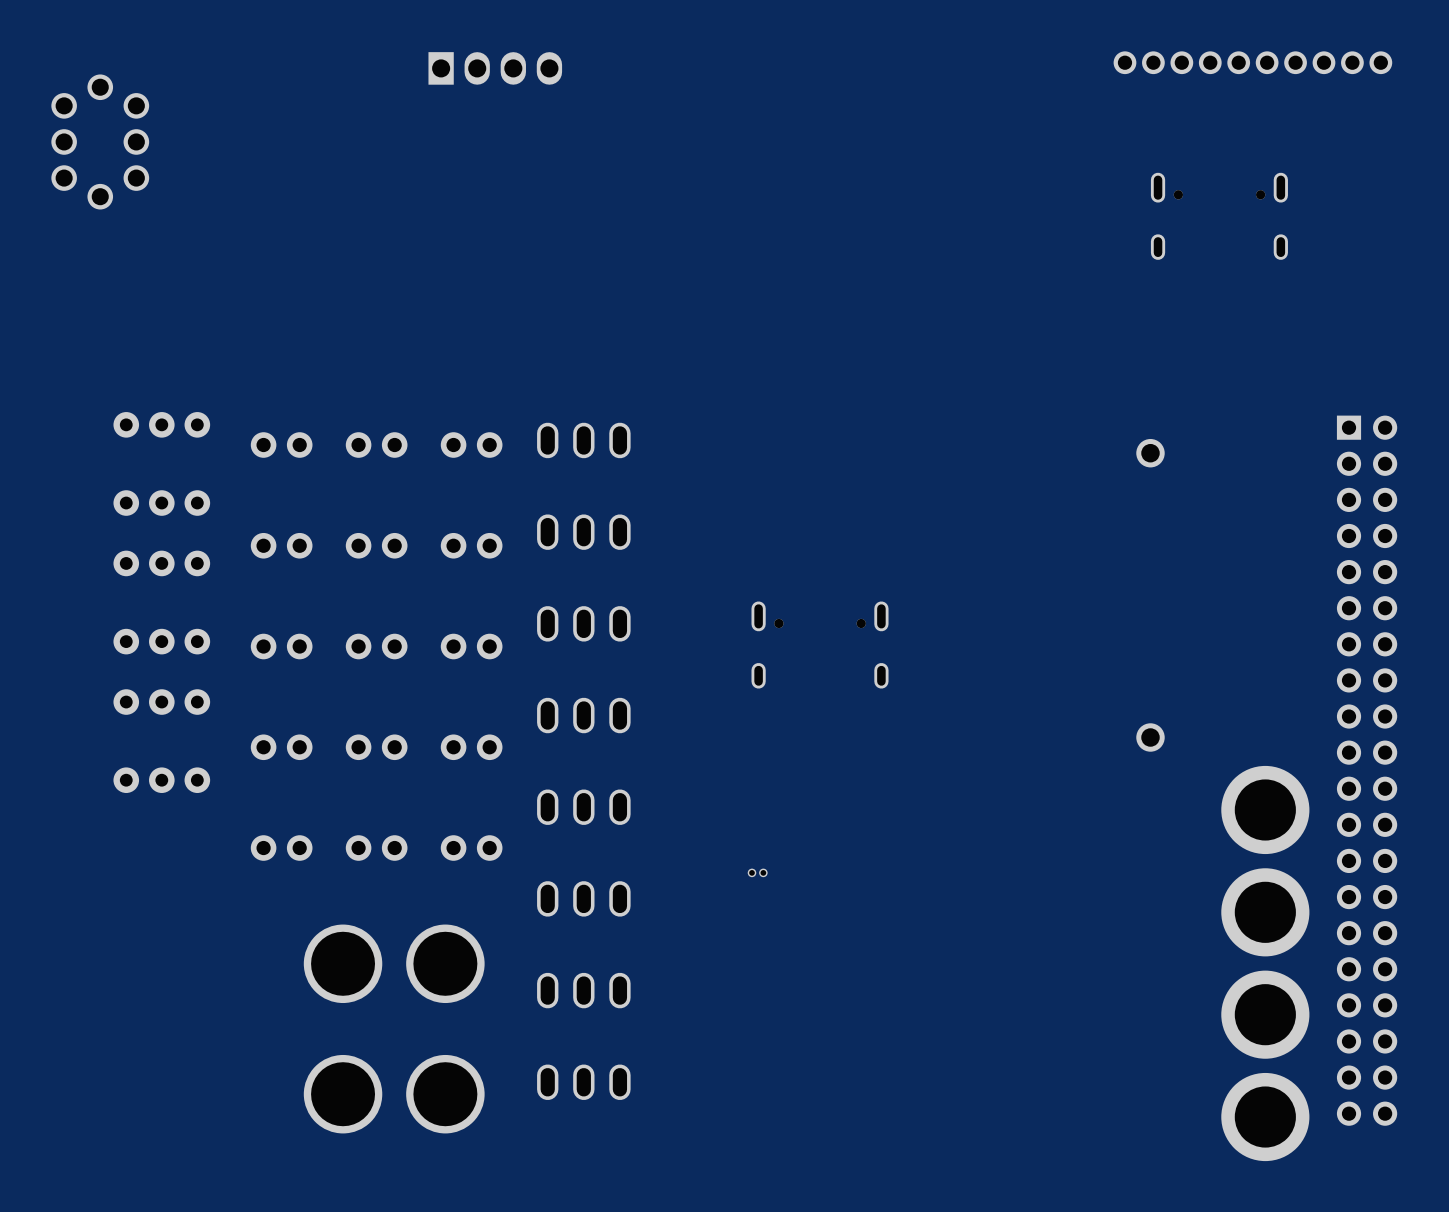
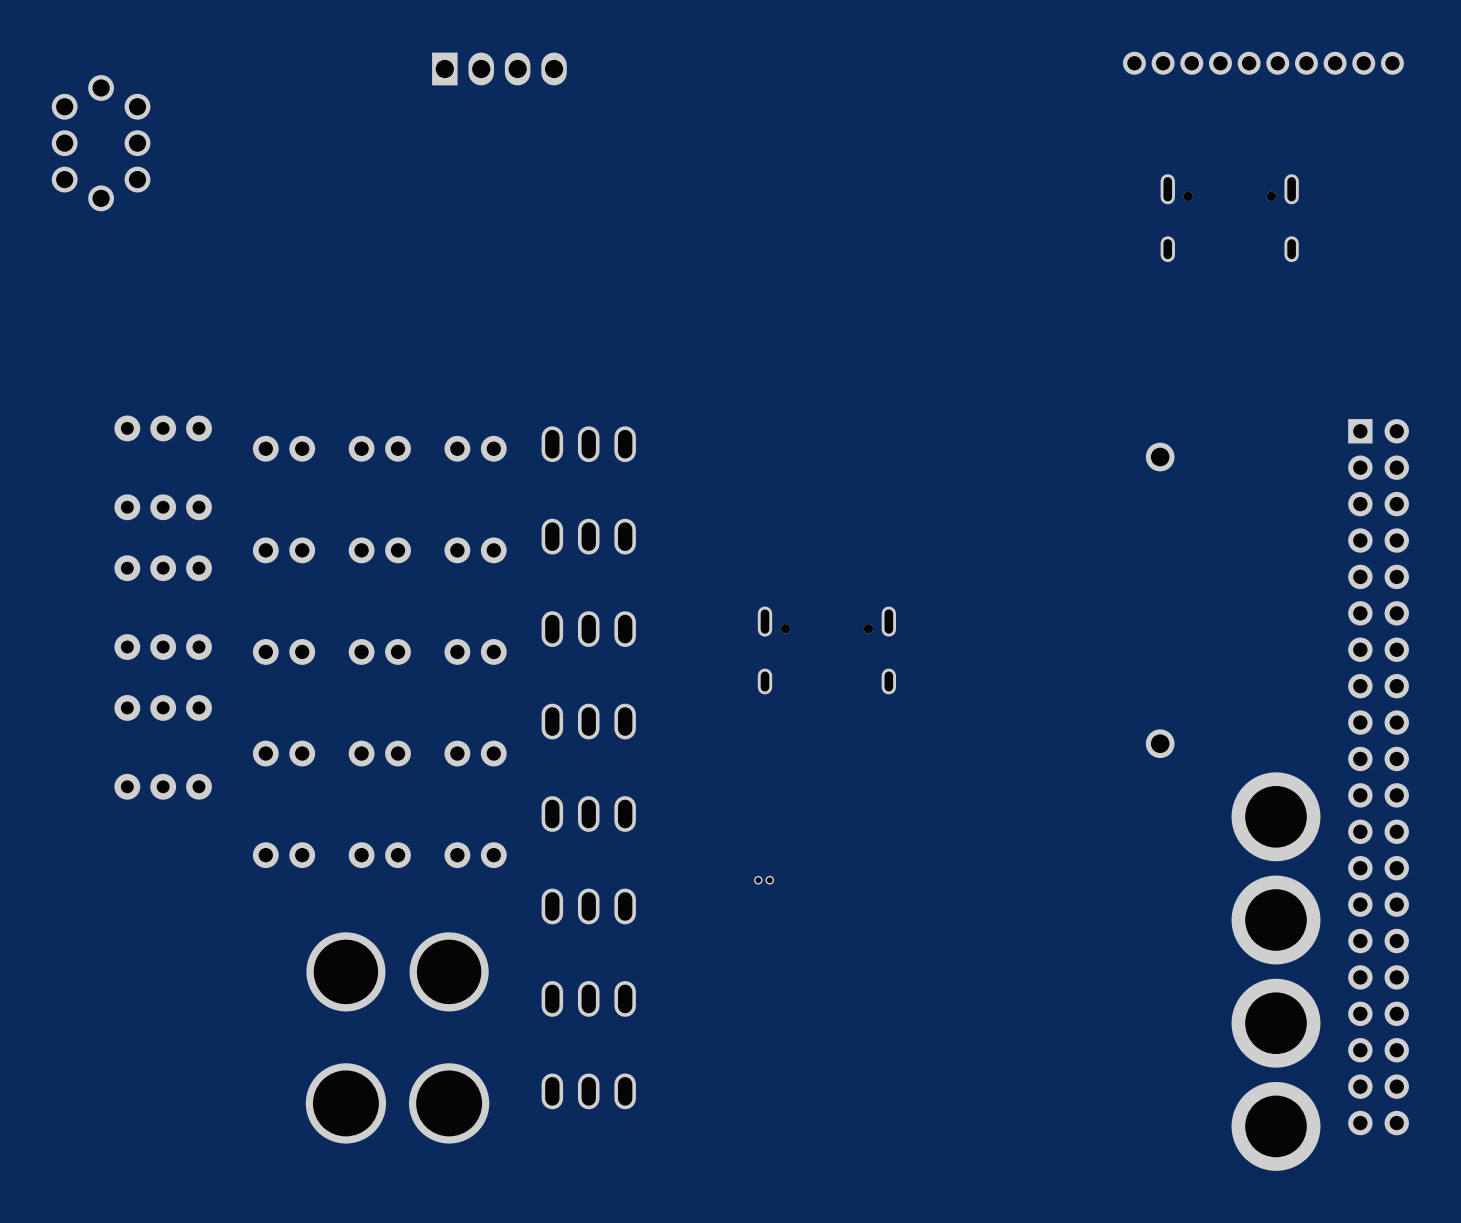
part footprint: [303, 1054, 485, 1134] -> [305, 1063, 490, 1144]

